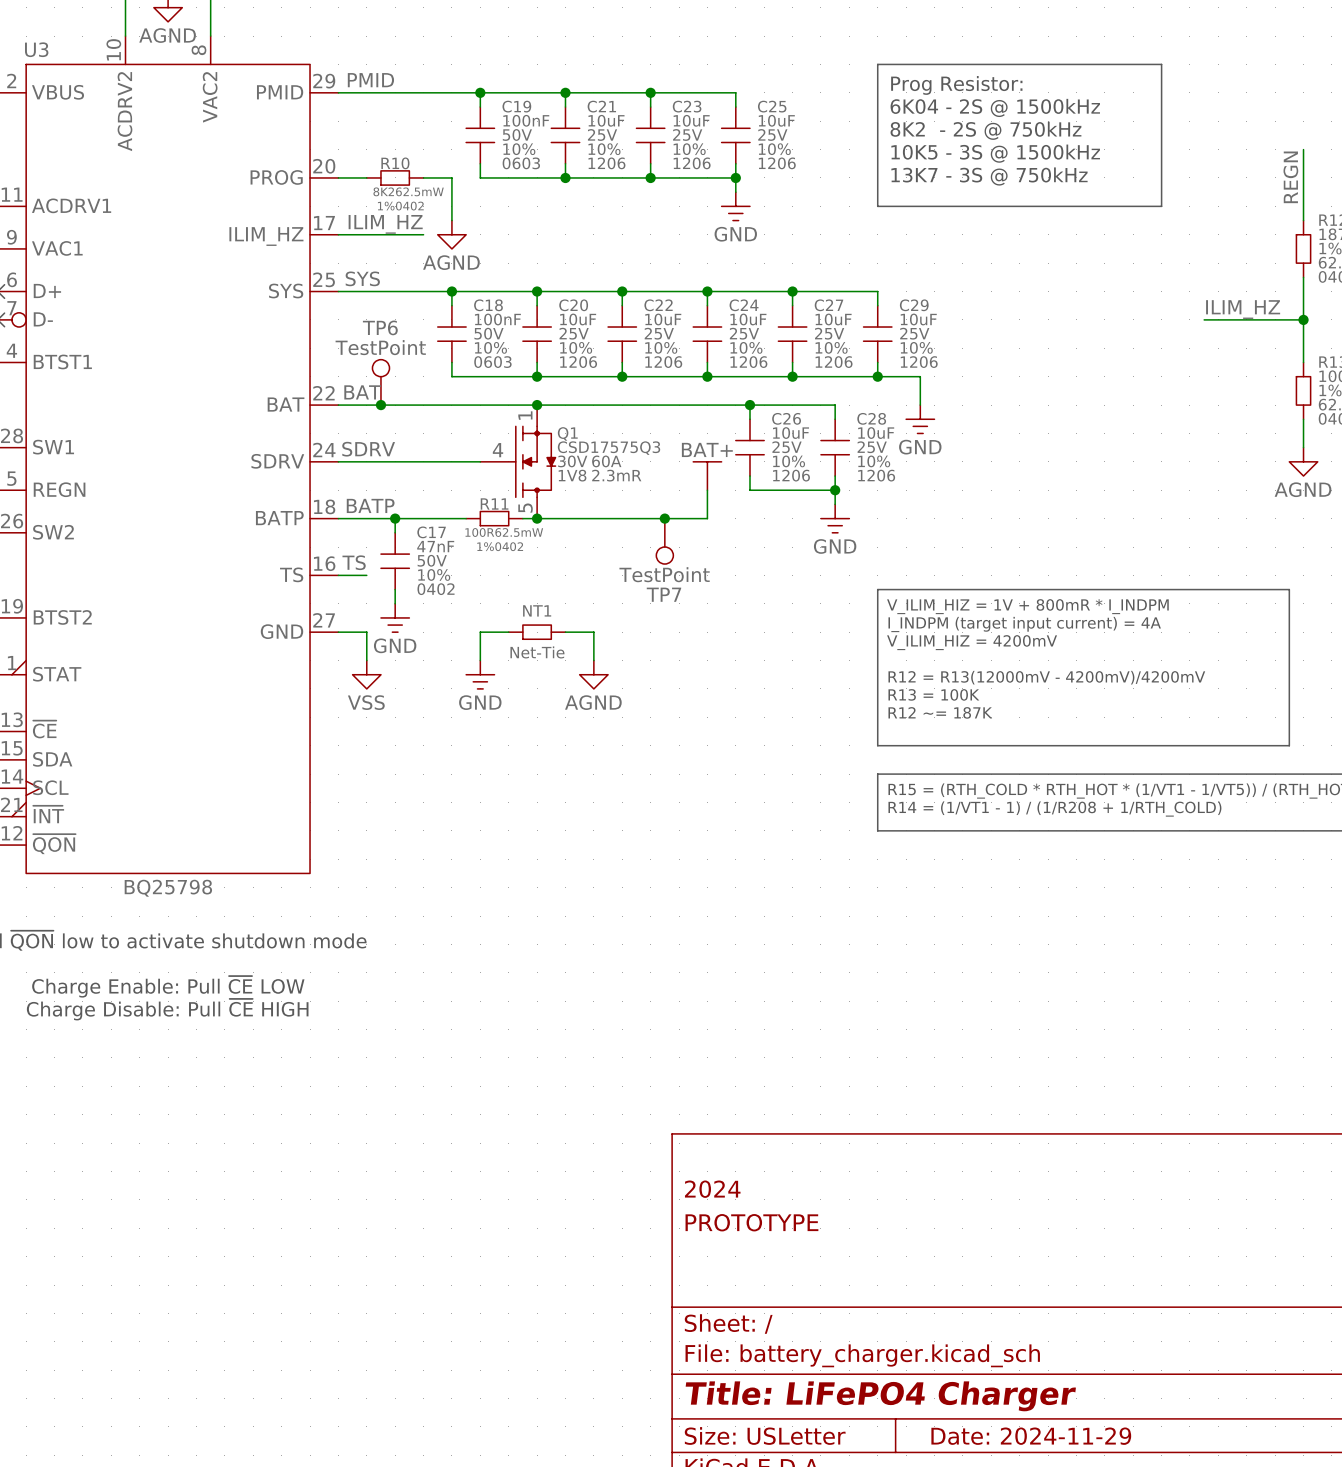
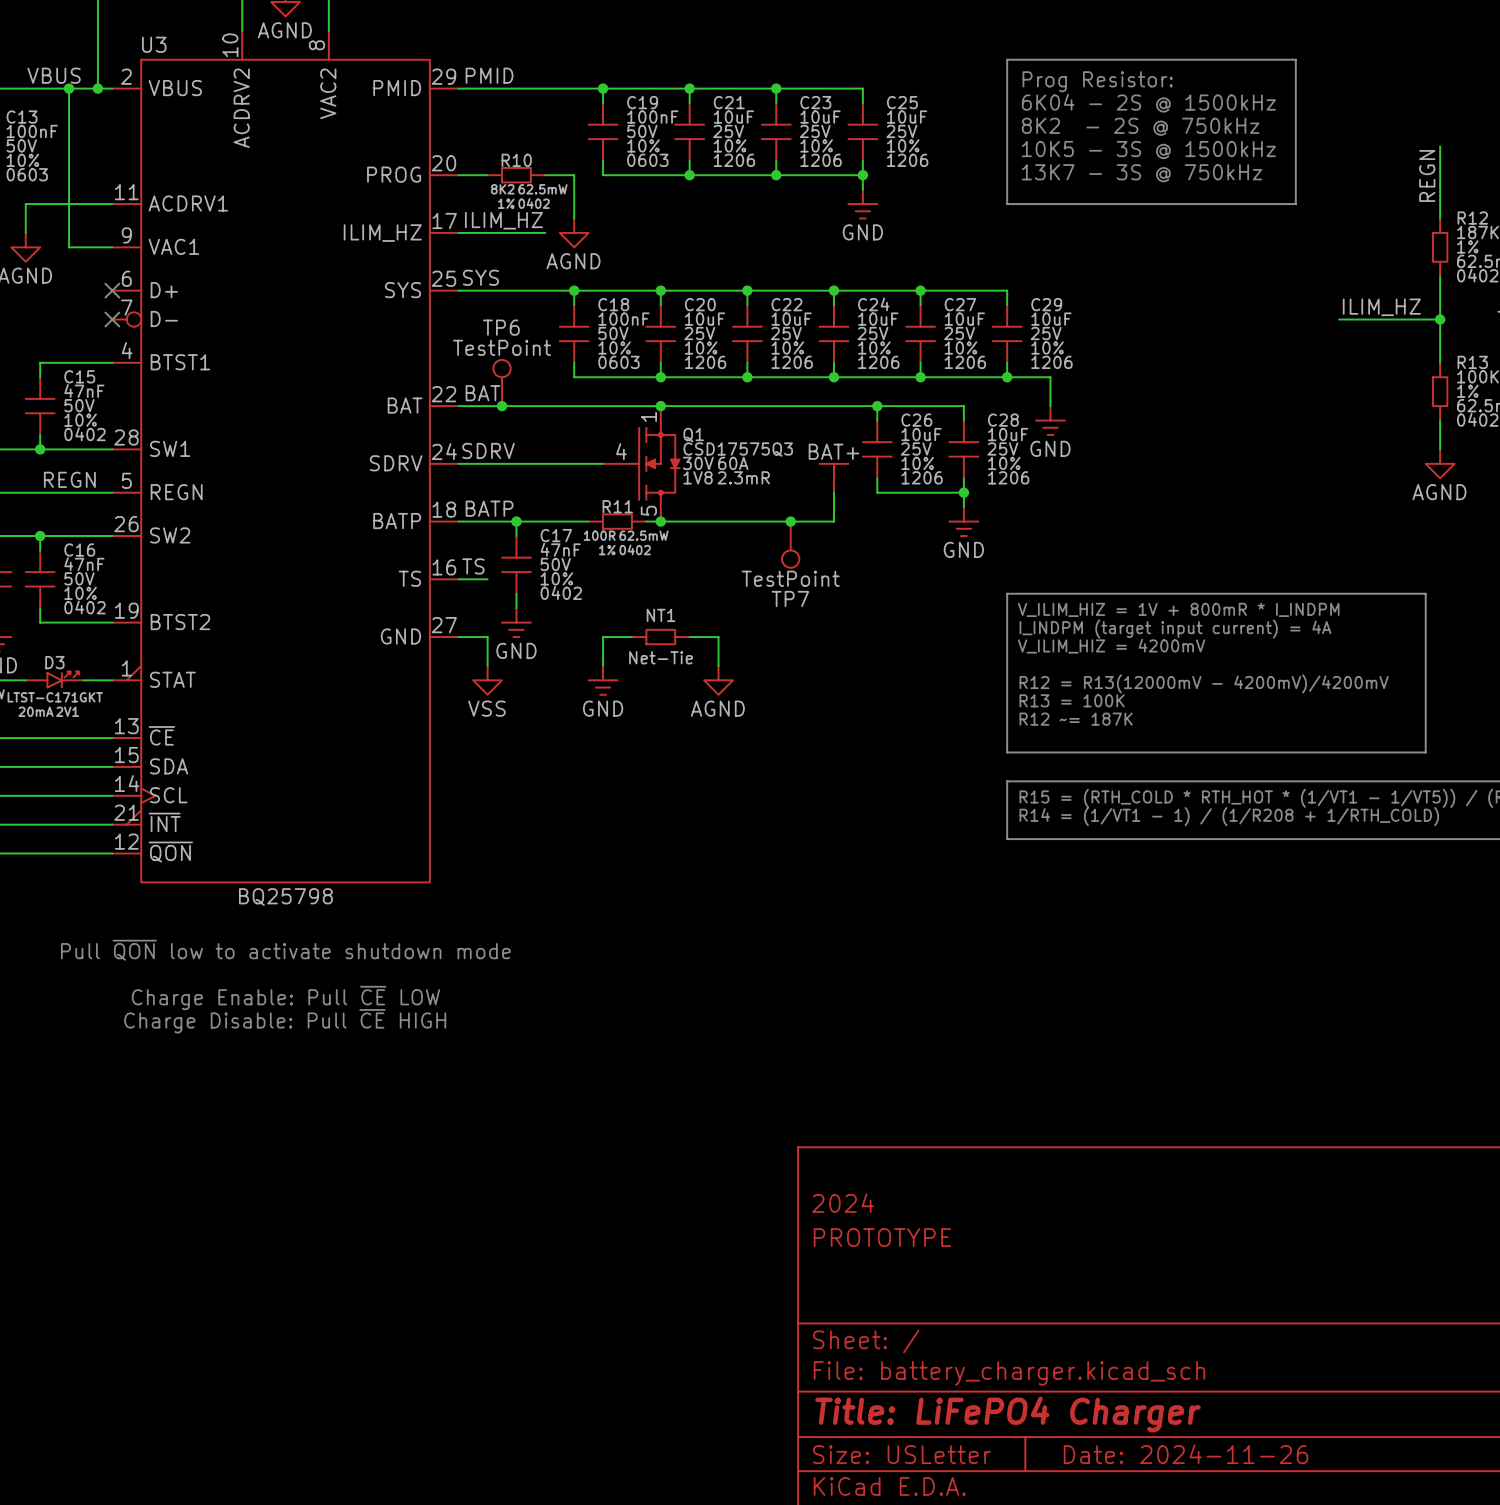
title block: Date: 2024-11-29 (1031, 1436) -> Date: 2024-11-26 (1186, 1454)

